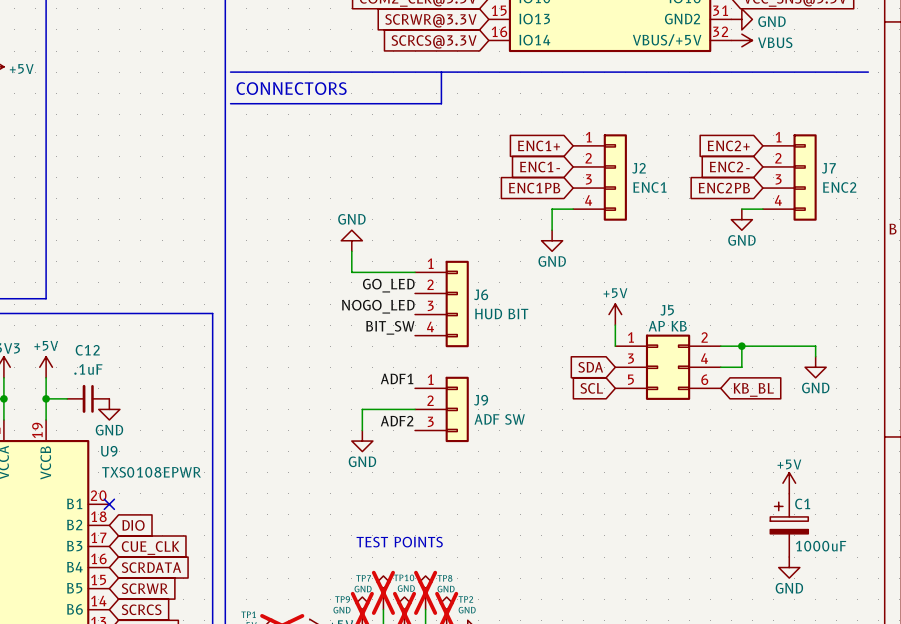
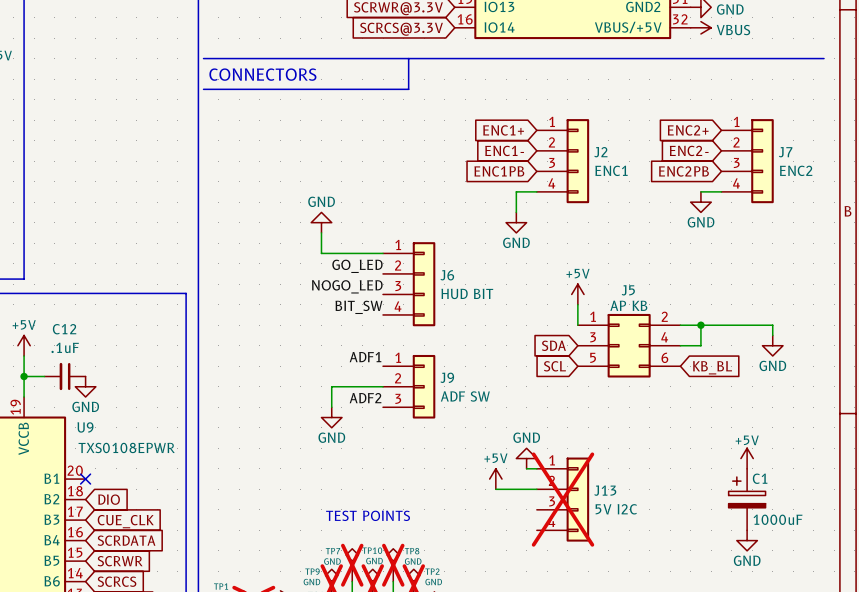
power symbol: none -> GND (526, 458)
wire: none -> (526, 468) (536, 468)
power symbol: none -> +5V (495, 479)
wire: none -> (495, 489) (536, 489)
J13: none -> 5V I2C (563, 499)

